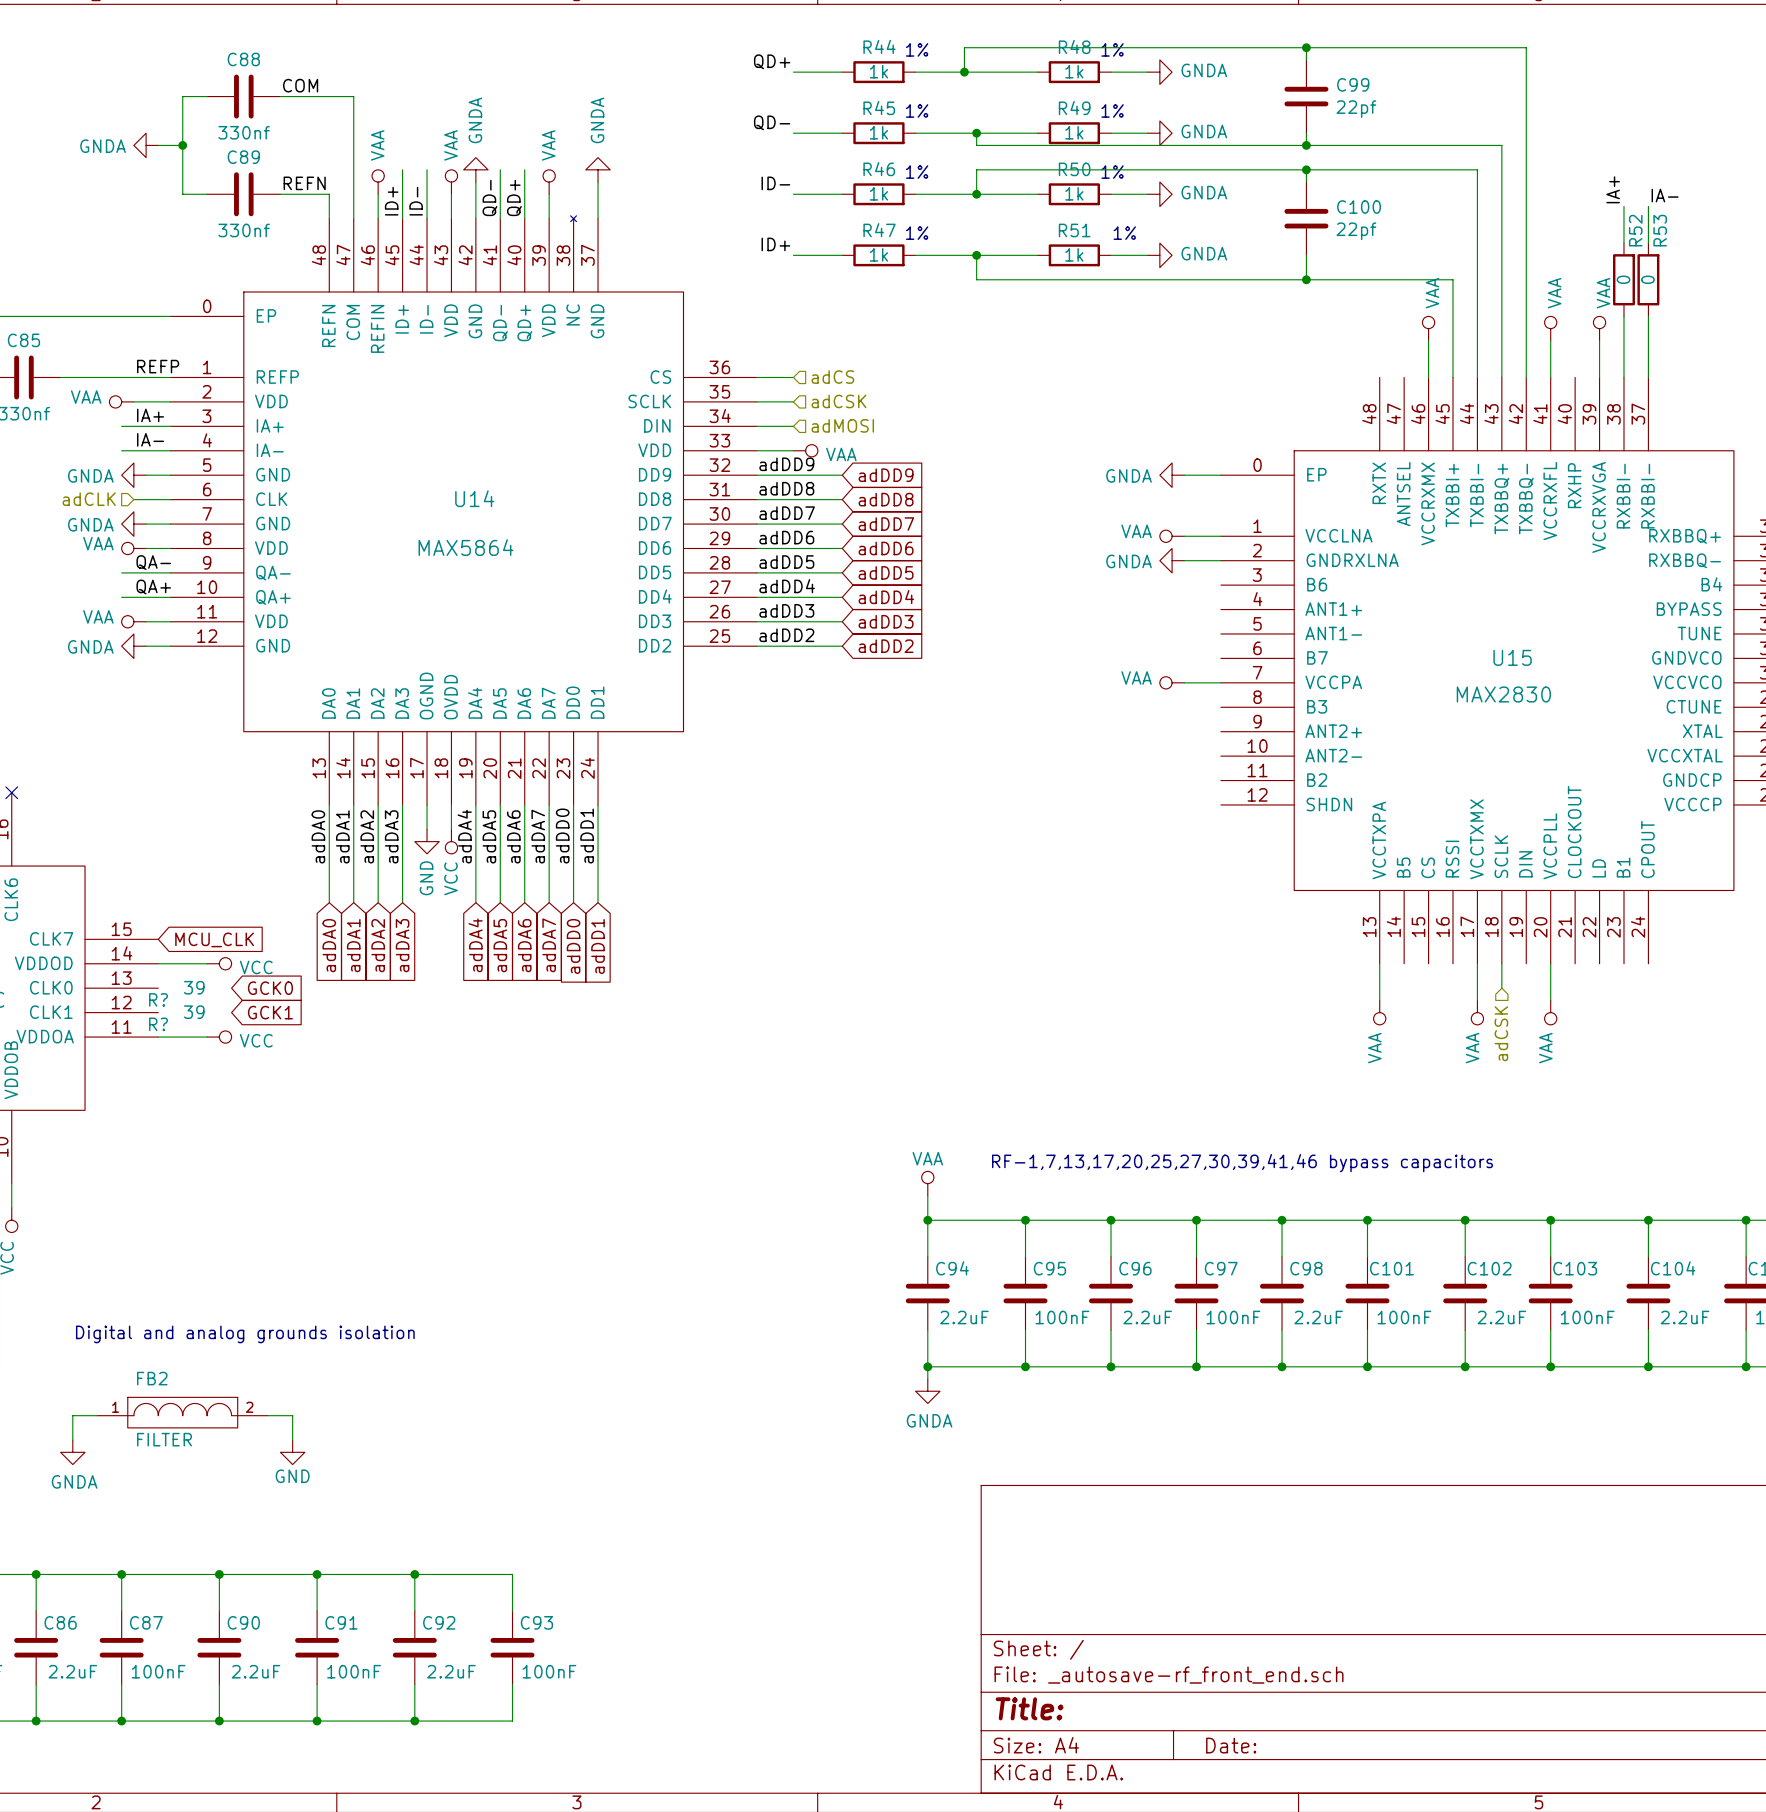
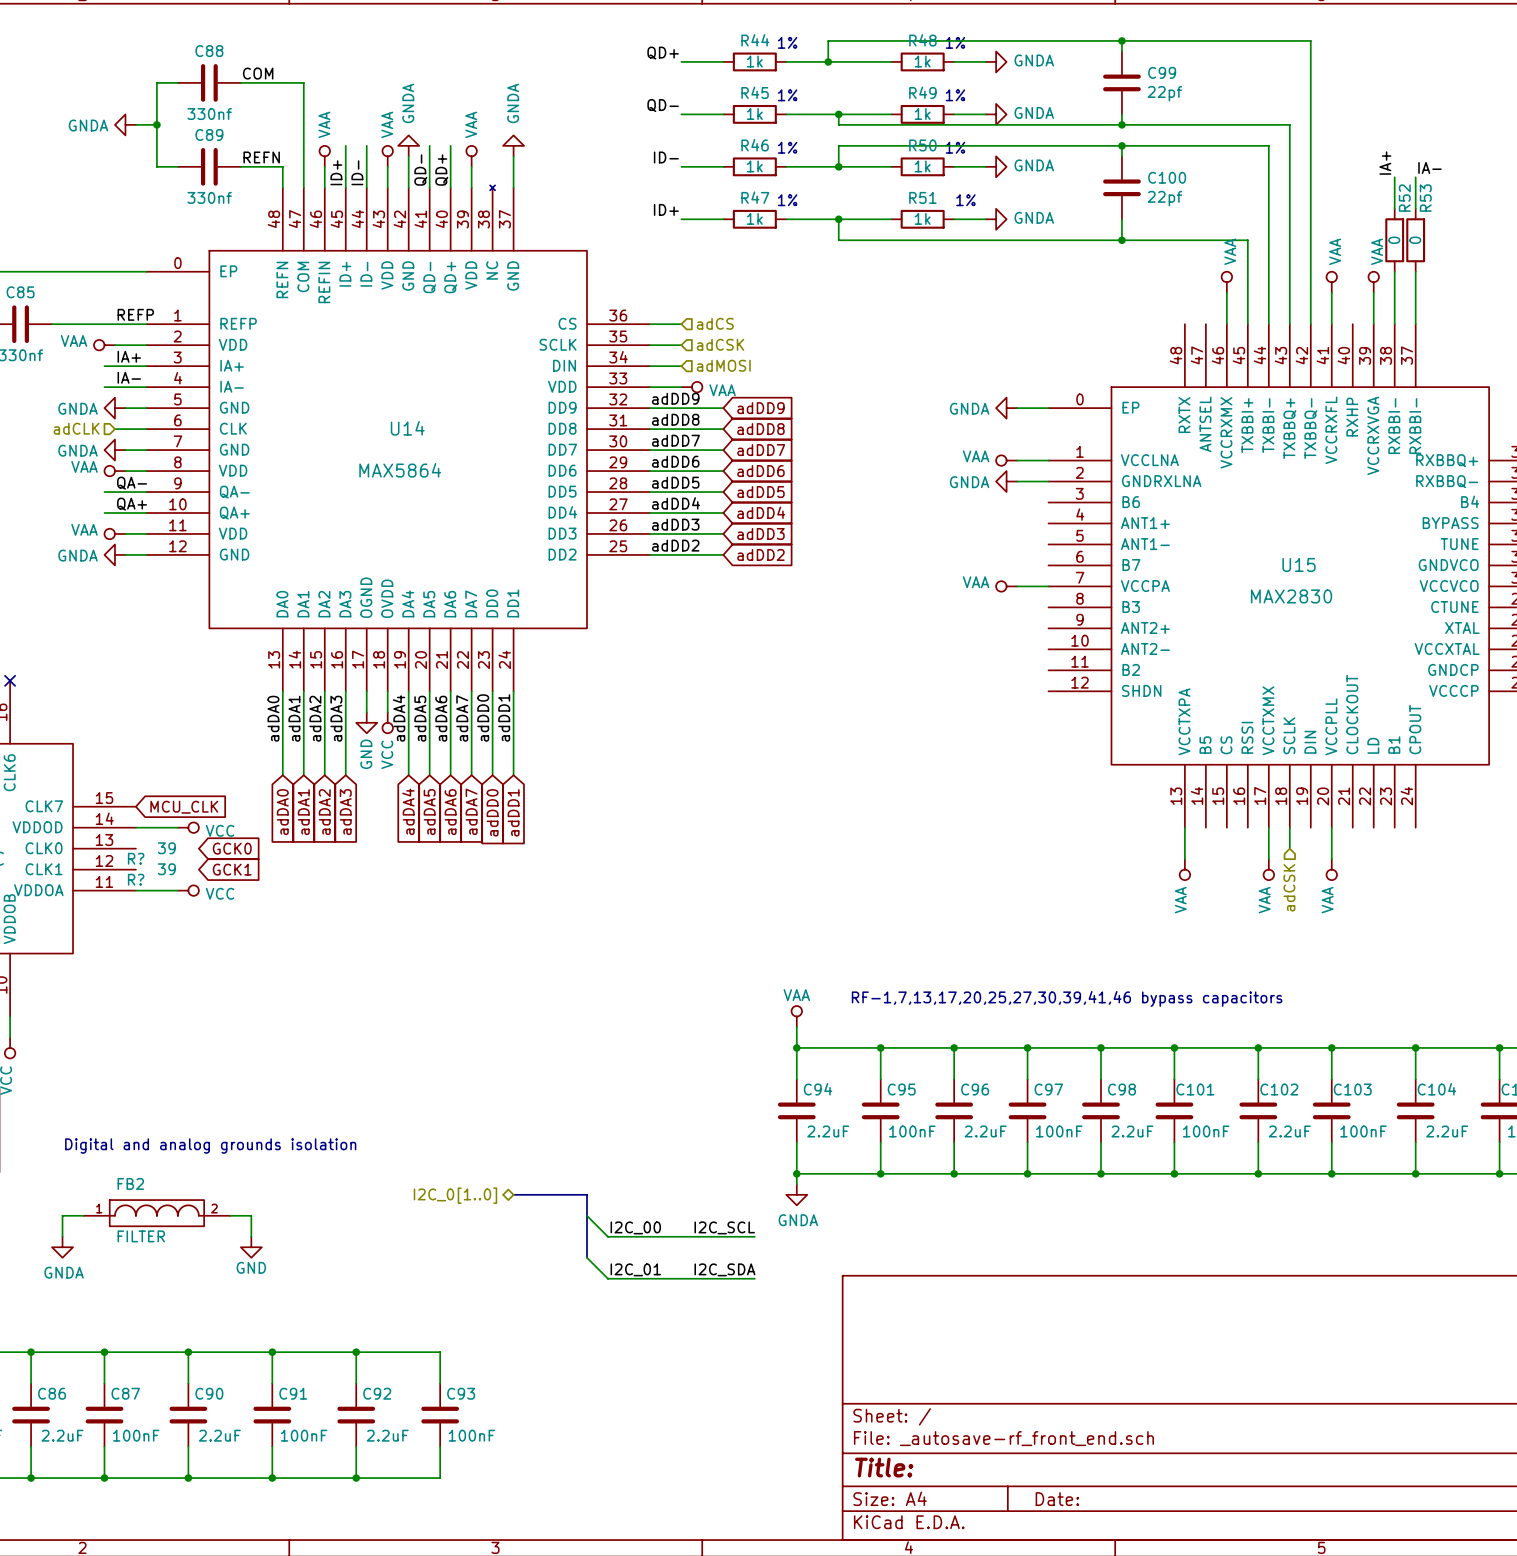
bus: none -> (513, 1194) (587, 1194) (587, 1257)
hierarchical label: none -> I2C_0[1..0] (455, 1195)
wire: none -> (587, 1215) (607, 1236) (754, 1236)
label: none -> I2C_00 (635, 1227)
label: none -> I2C_SCL (724, 1227)
wire: none -> (587, 1257) (607, 1278) (754, 1278)
label: none -> I2C_01 (635, 1269)
label: none -> I2C_SDA (724, 1269)

